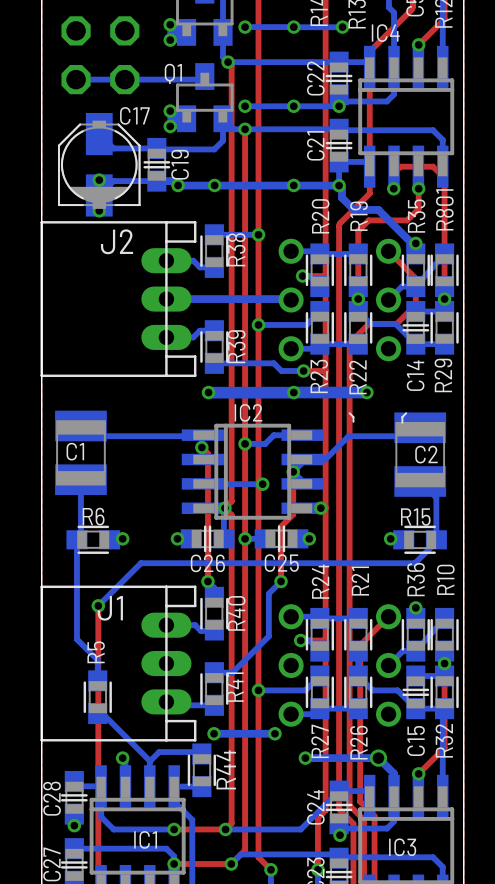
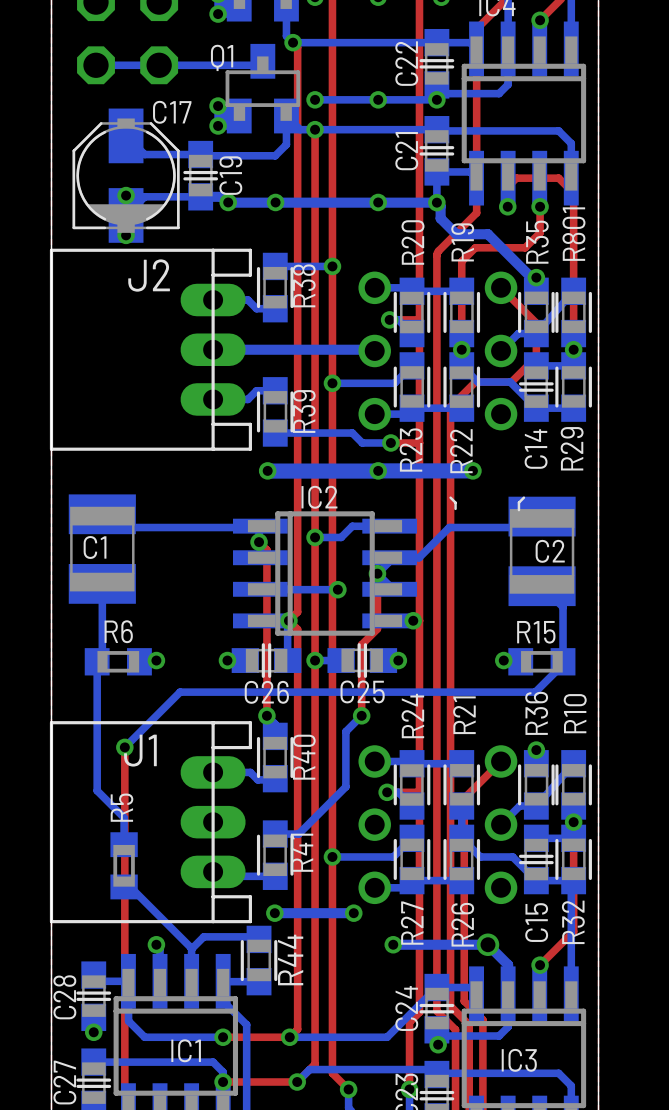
R6 footprint: [66, 525, 121, 554] -> [84, 648, 152, 676]
R15 footprint: [393, 525, 447, 554] -> [508, 648, 576, 676]
R5 footprint: [83, 670, 112, 725] -> [110, 832, 138, 900]

